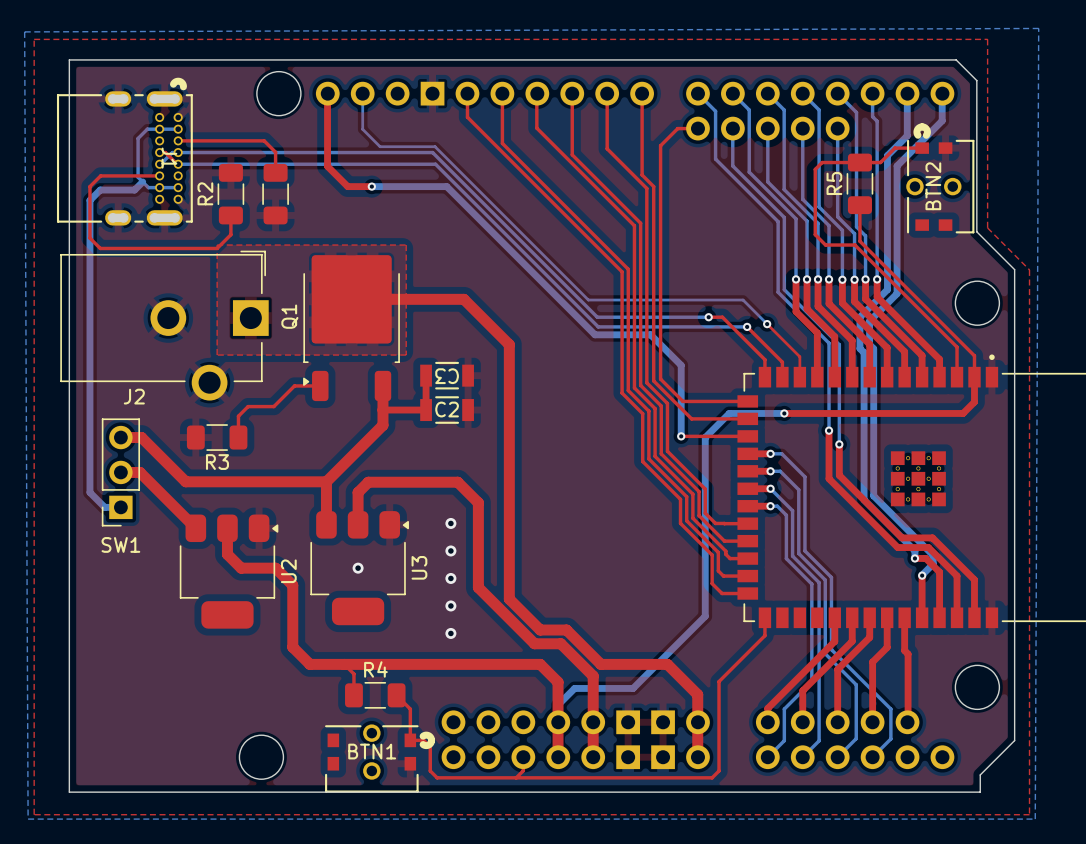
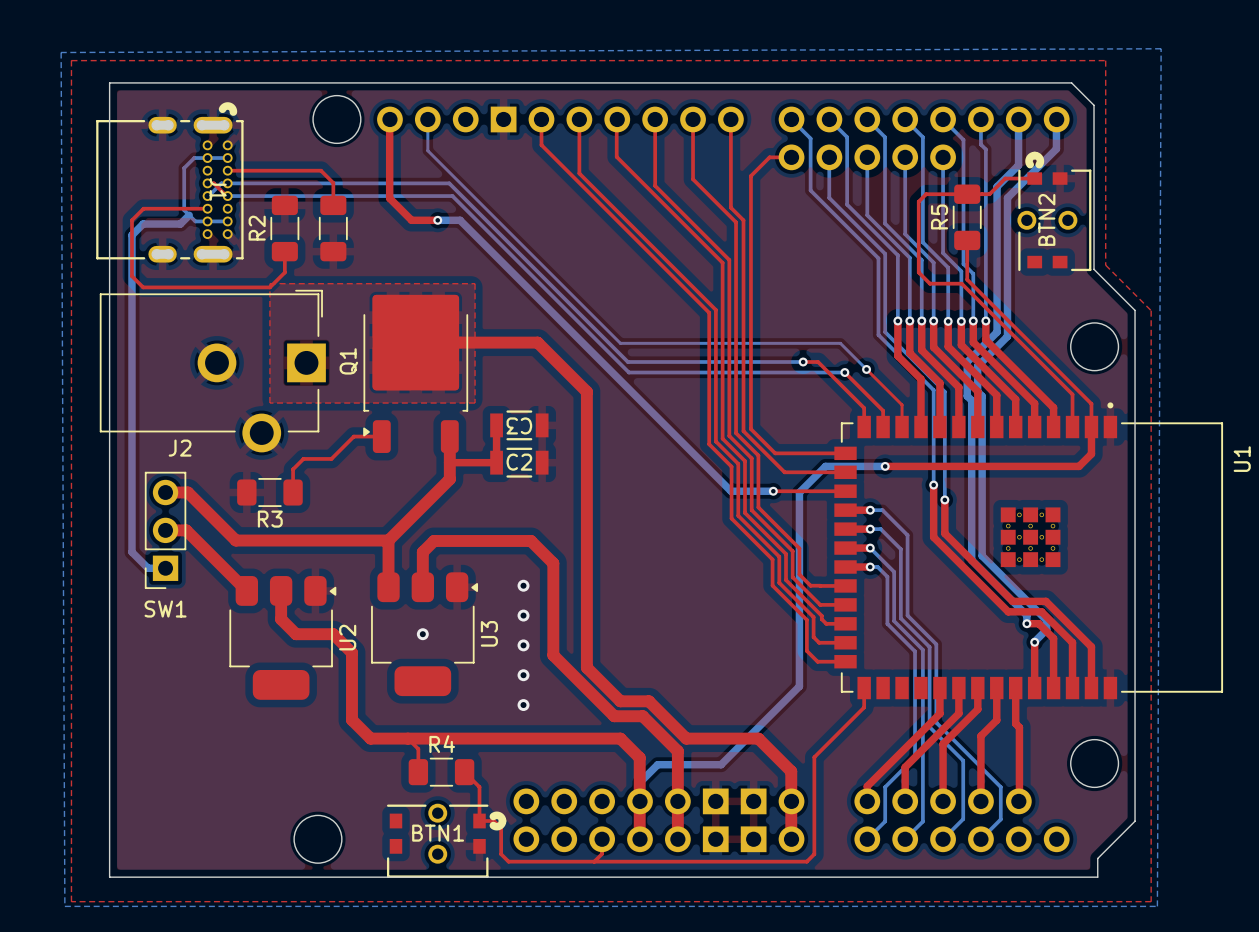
bottom track: (362, 122) (362, 129) (380, 146) (435, 146) (588, 300) -> (427, 150) (620, 343) (672, 343)
bottom track: (382, 152) (432, 152) (597, 317) -> (449, 183) (627, 362) (682, 362)
bottom track: (385, 164) (435, 164) (598, 326) -> (452, 196) (628, 372) (683, 372)
bottom track: (392, 186) (446, 186) (594, 334) (650, 334) (681, 365) (681, 436) -> (460, 220) (731, 491) (773, 491)

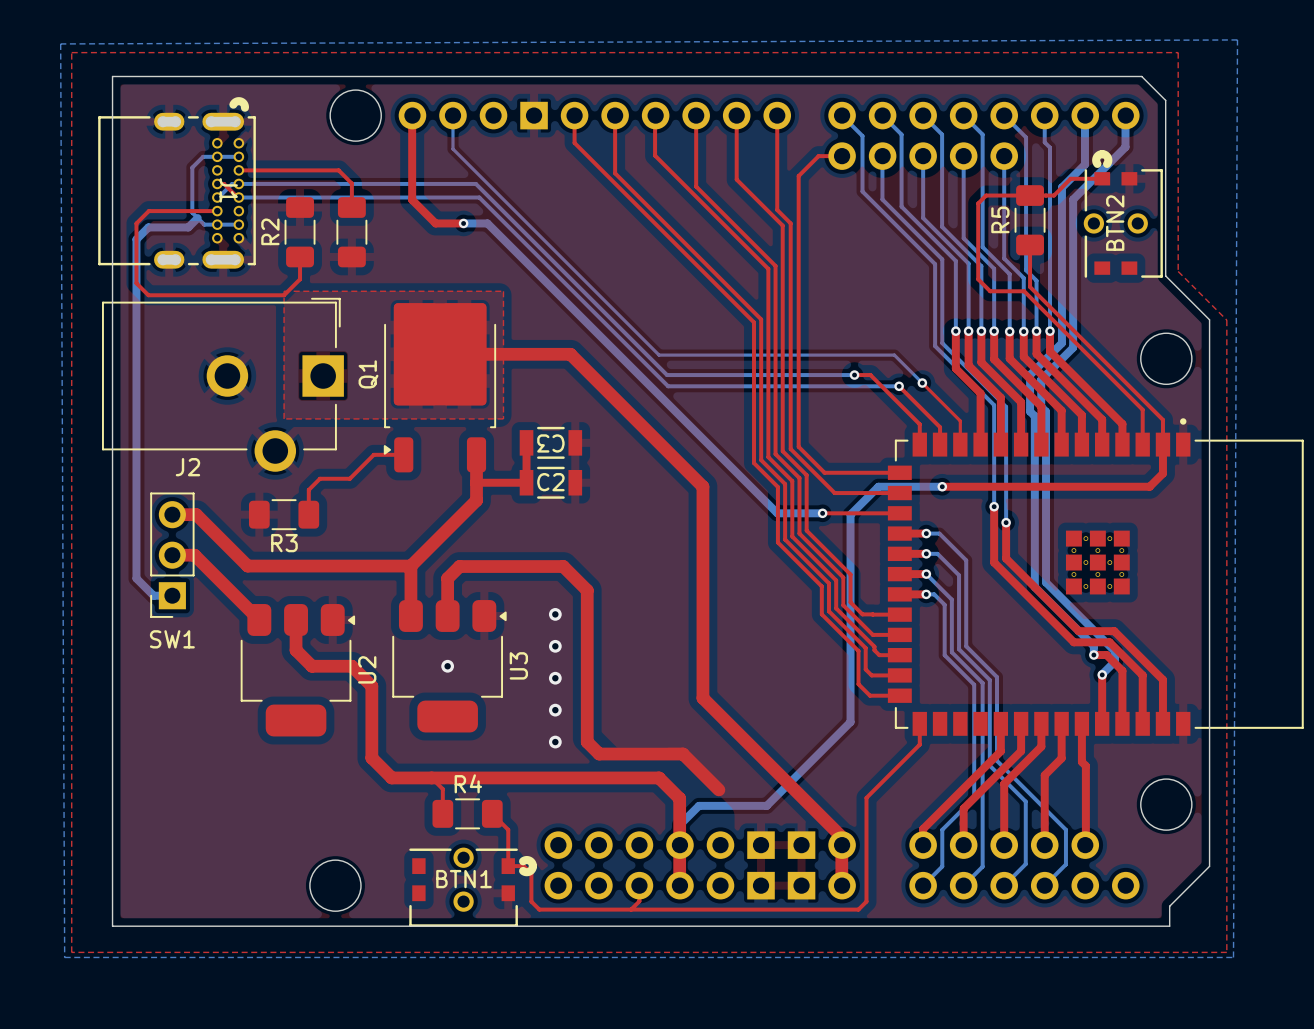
top track: (586, 391) (586, 667) (620, 701) (649, 701) (686, 738) (758, 738) (791, 771) (791, 793) -> (623, 406) (702, 486) (702, 698) (841, 837)
top track: (553, 655) (614, 716) -> (587, 688) (587, 742) (599, 754) (652, 754)
top track: (676, 749) (677, 839) -> none

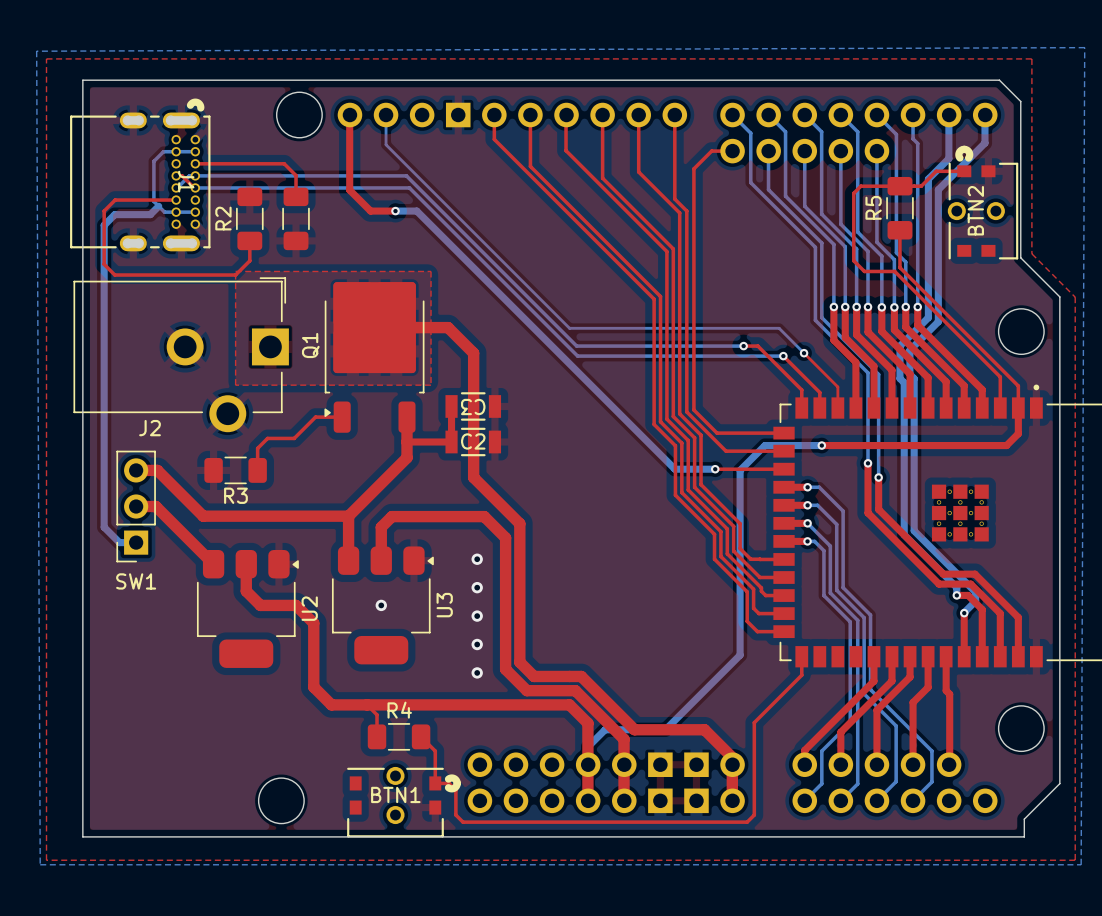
top track: (522, 354) (570, 354) (702, 486) (702, 698) (810, 805) -> (448, 327) (473, 353) (473, 477) (519, 523) (519, 662) (534, 676) (581, 676) (634, 729) (704, 729)
top track: (587, 738) (587, 742) (599, 754) (682, 754) (718, 789) -> (505, 669) (526, 690) (575, 690) (624, 739) (624, 802)
top track: (639, 885) (639, 901) (631, 909) -> none

